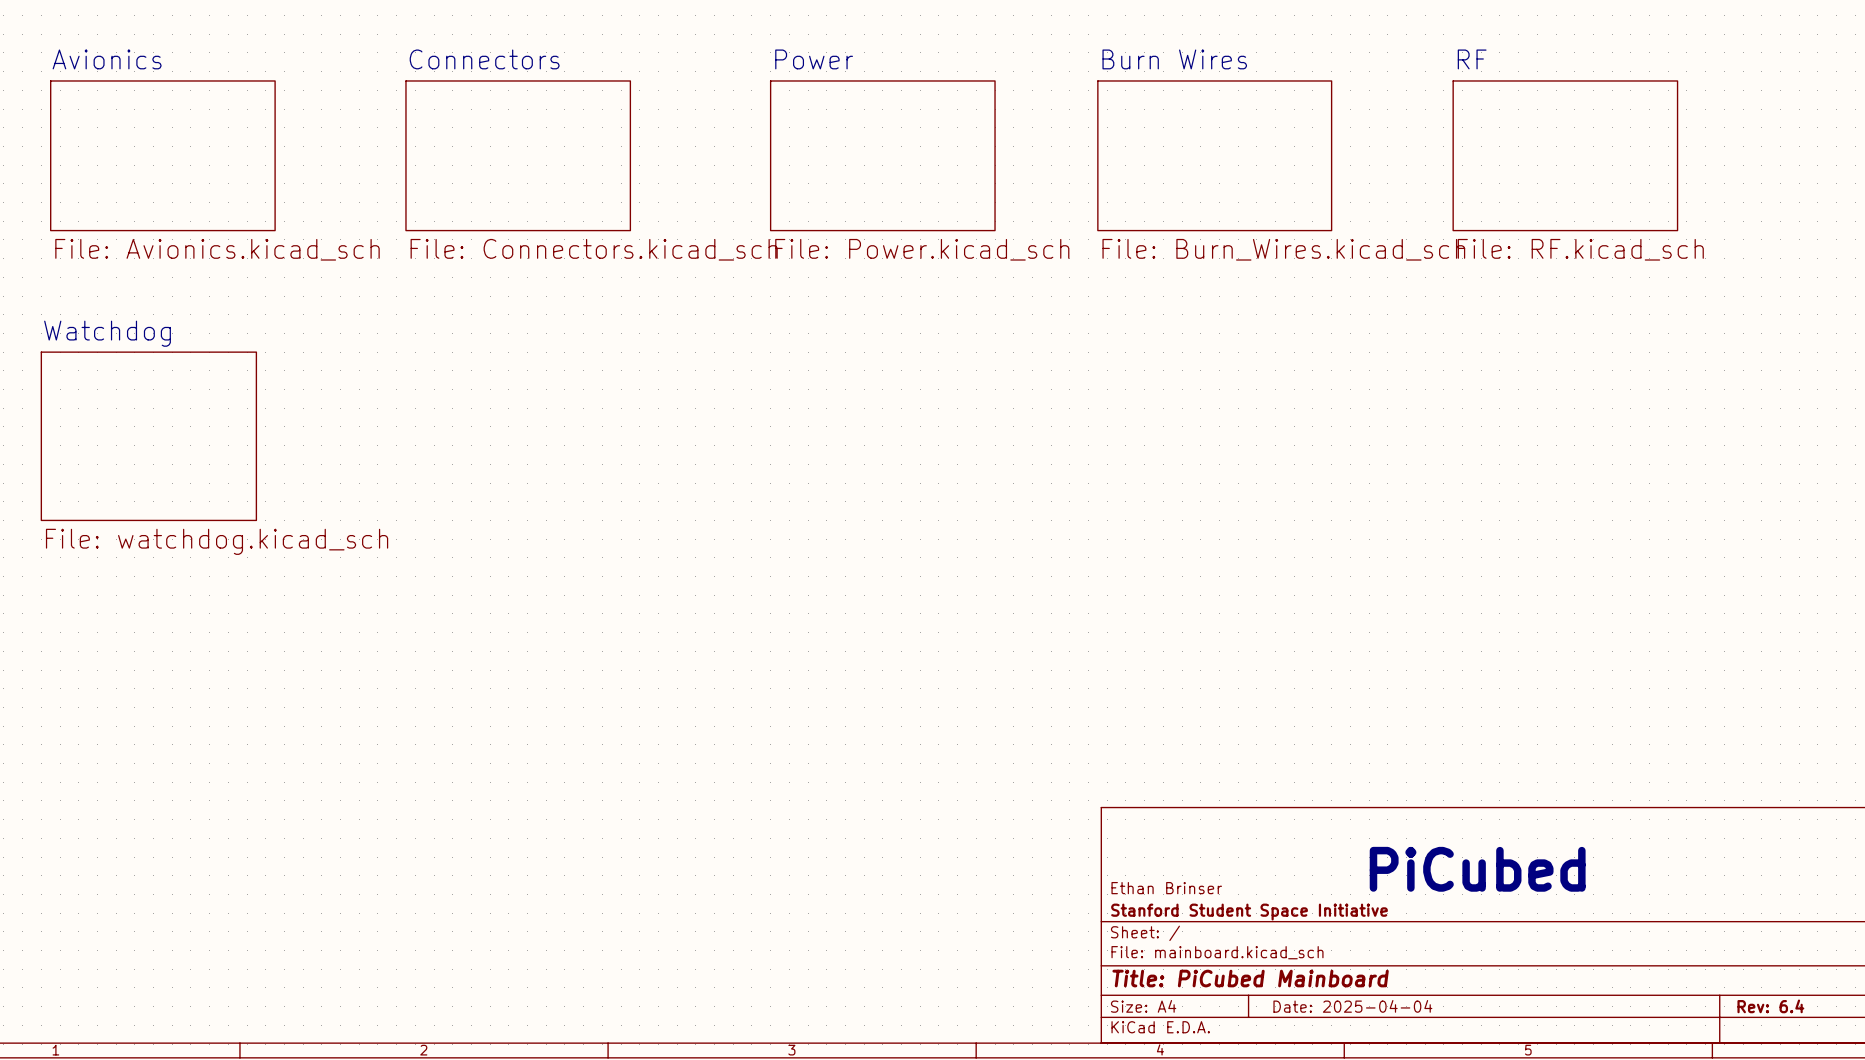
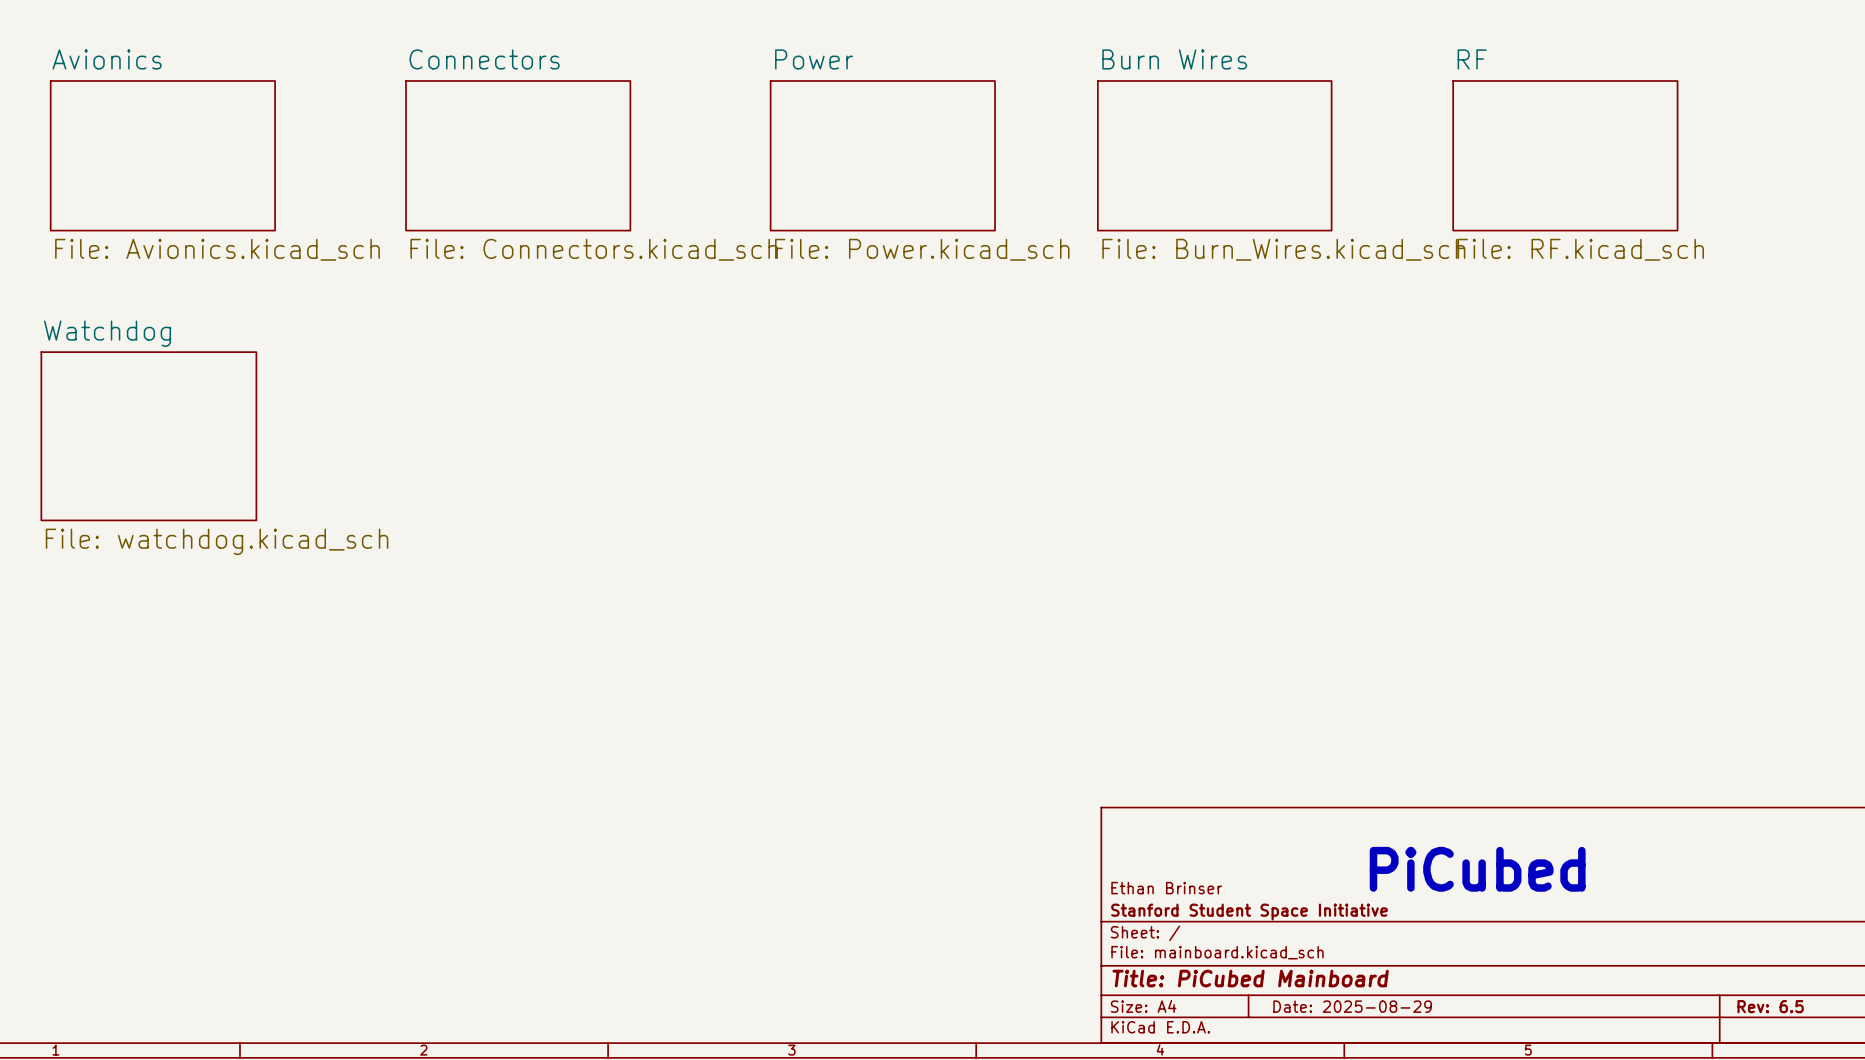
title block: Date: 2025-04-04 (1352, 1006) -> Date: 2025-08-29 (1352, 1006)
title block: Rev: 6.4 (1770, 1006) -> Rev: 6.5 (1770, 1006)

